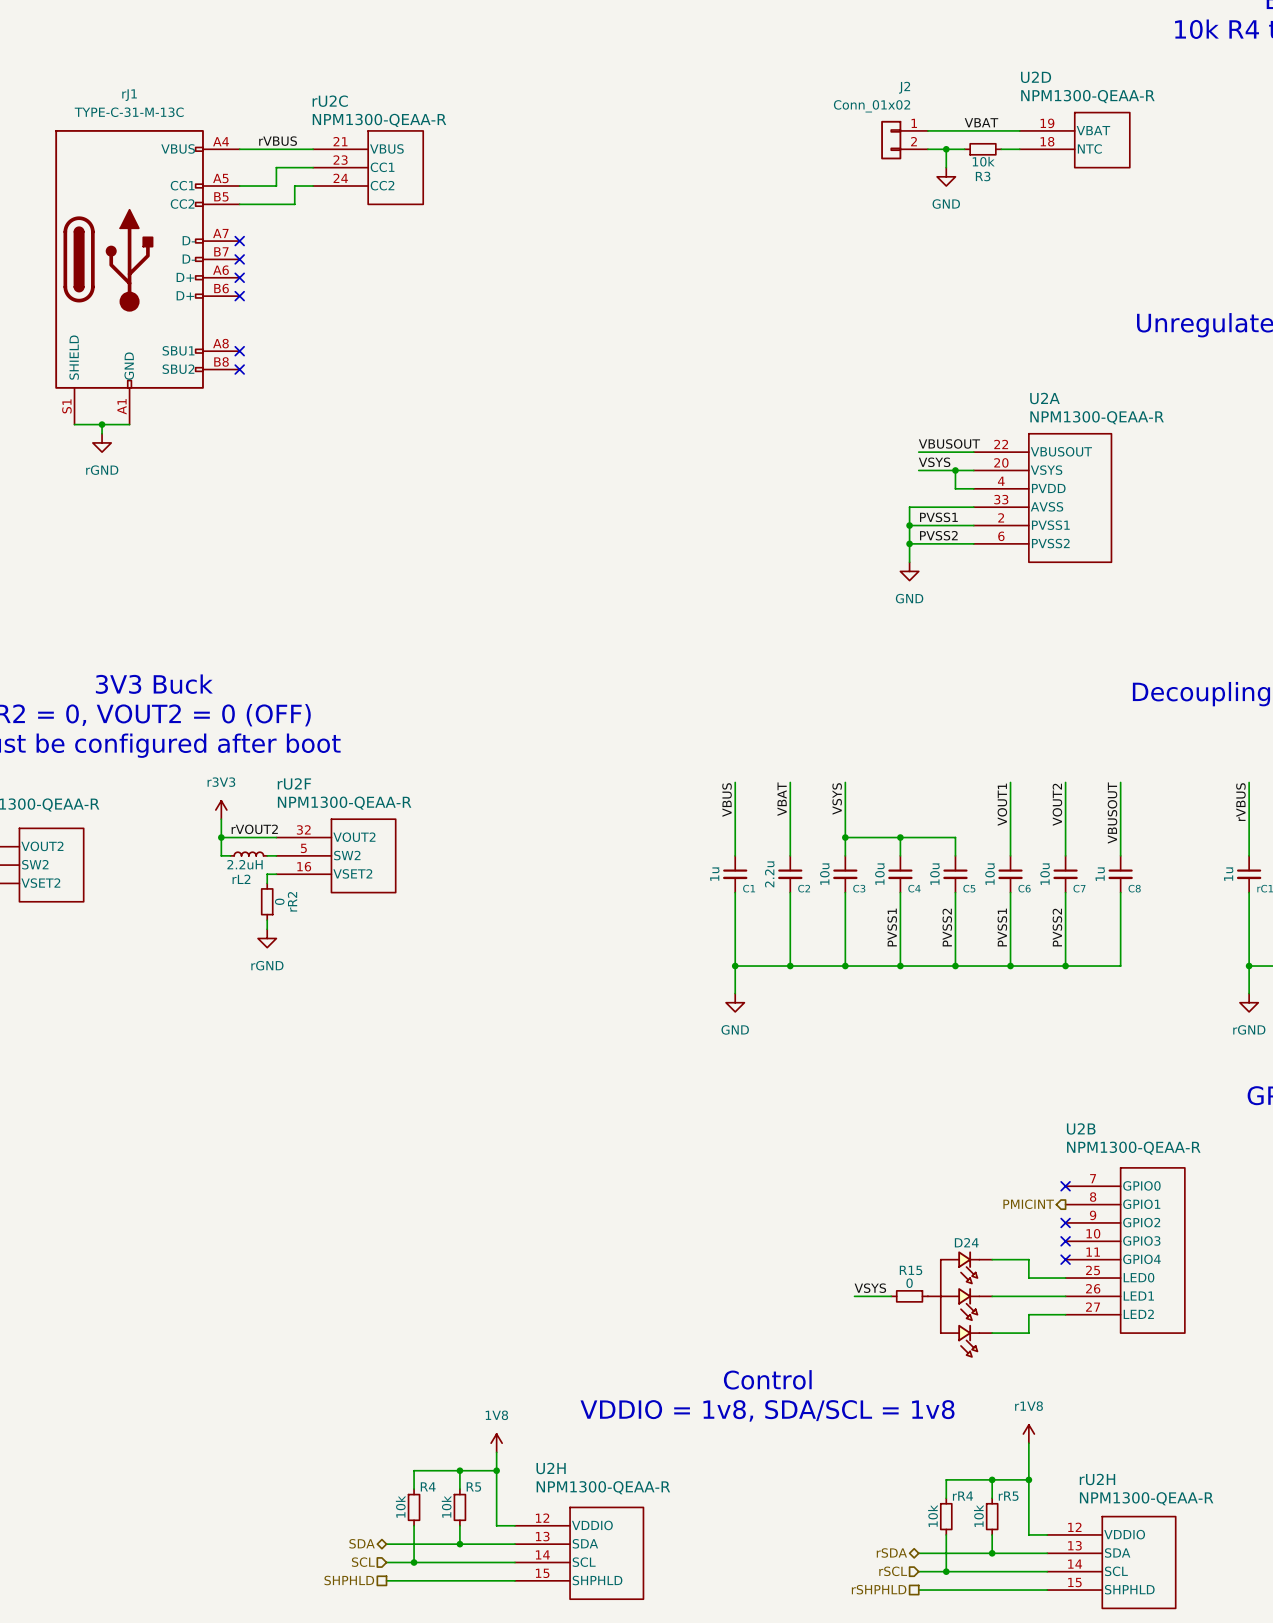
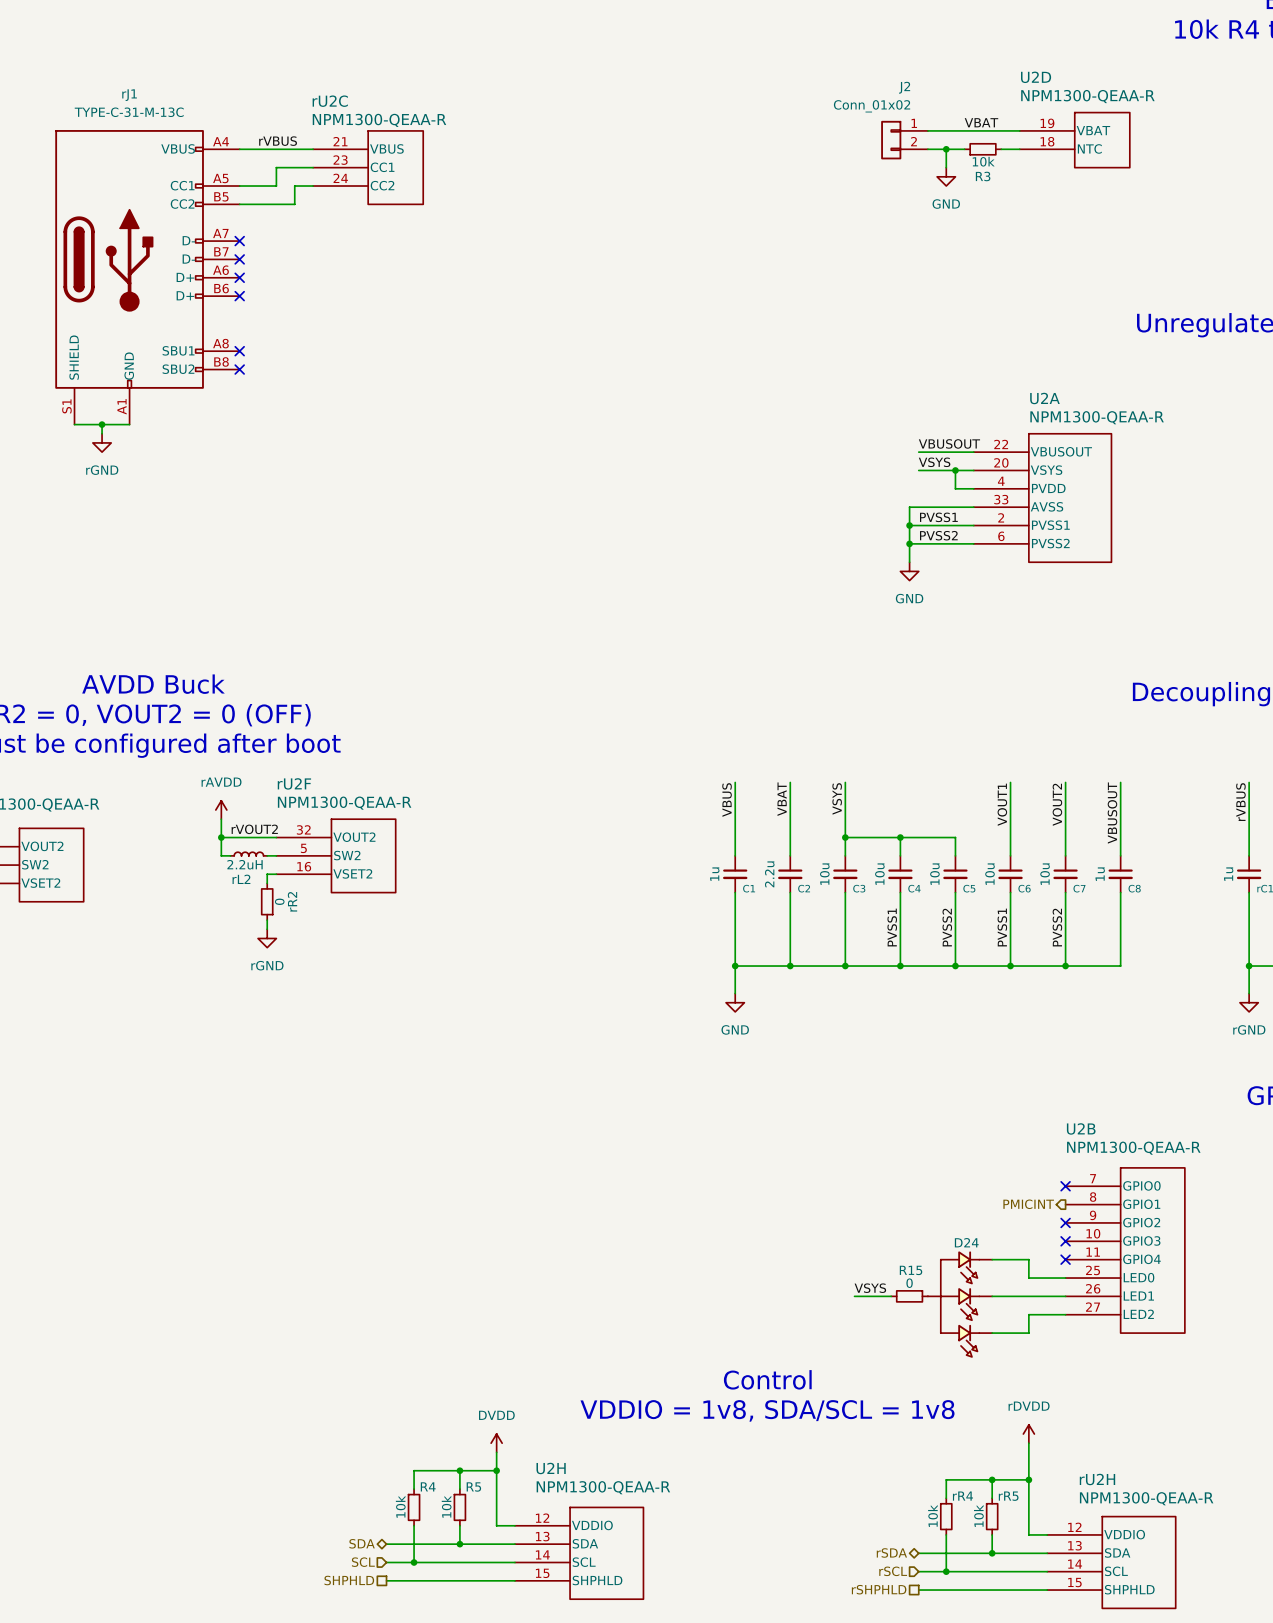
text: 3V3 Buck (154, 684) -> AVDD Buck (153, 684)
power symbol: r3V3 (221, 810) -> rAVDD (221, 810)
power symbol: r1V8 (1028, 1434) -> rDVDD (1028, 1434)
power symbol: 1V8 (496, 1443) -> DVDD (496, 1443)

